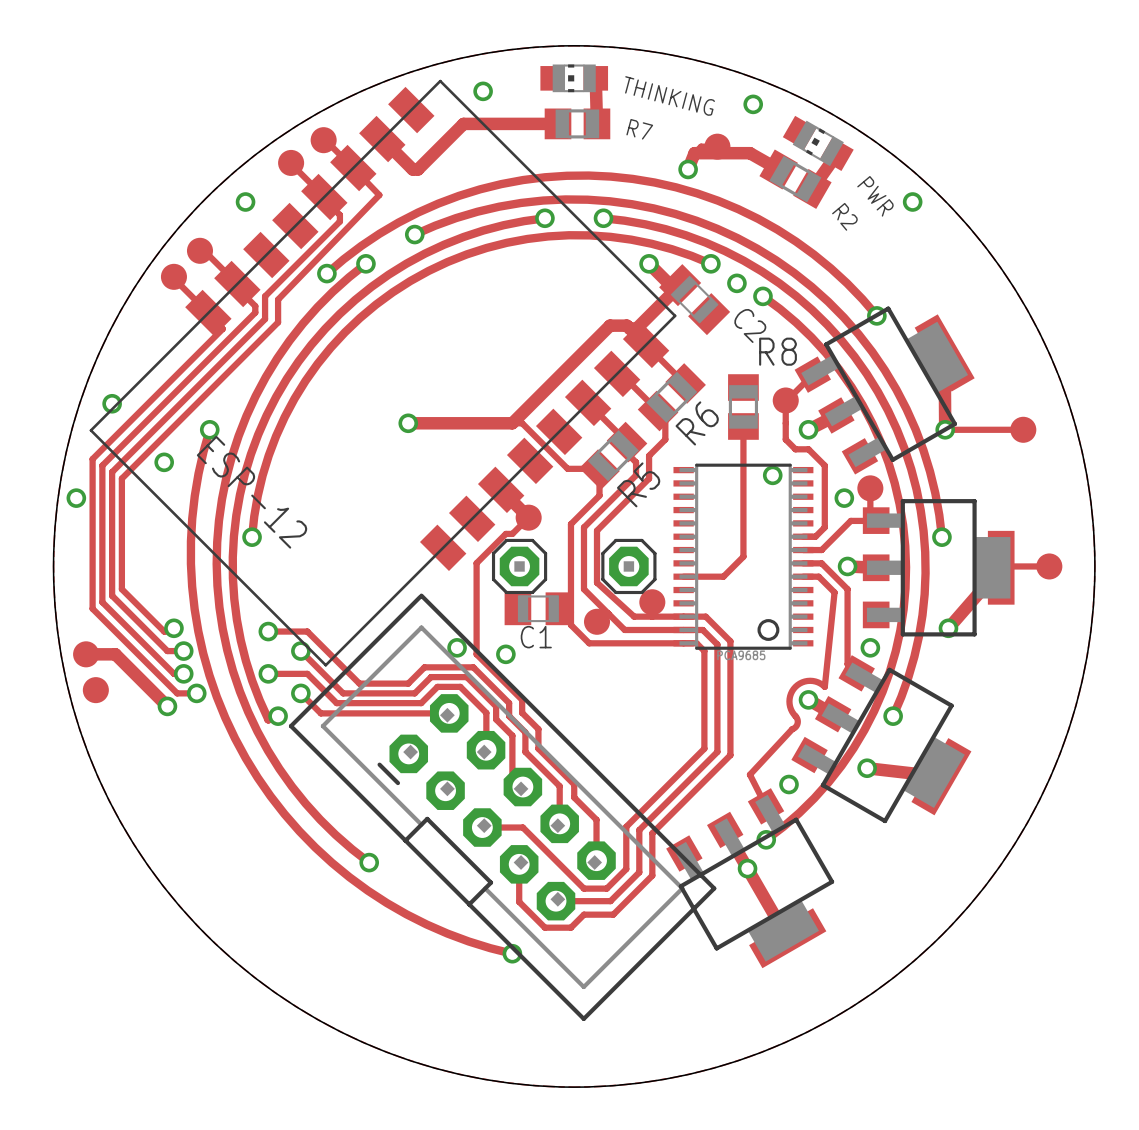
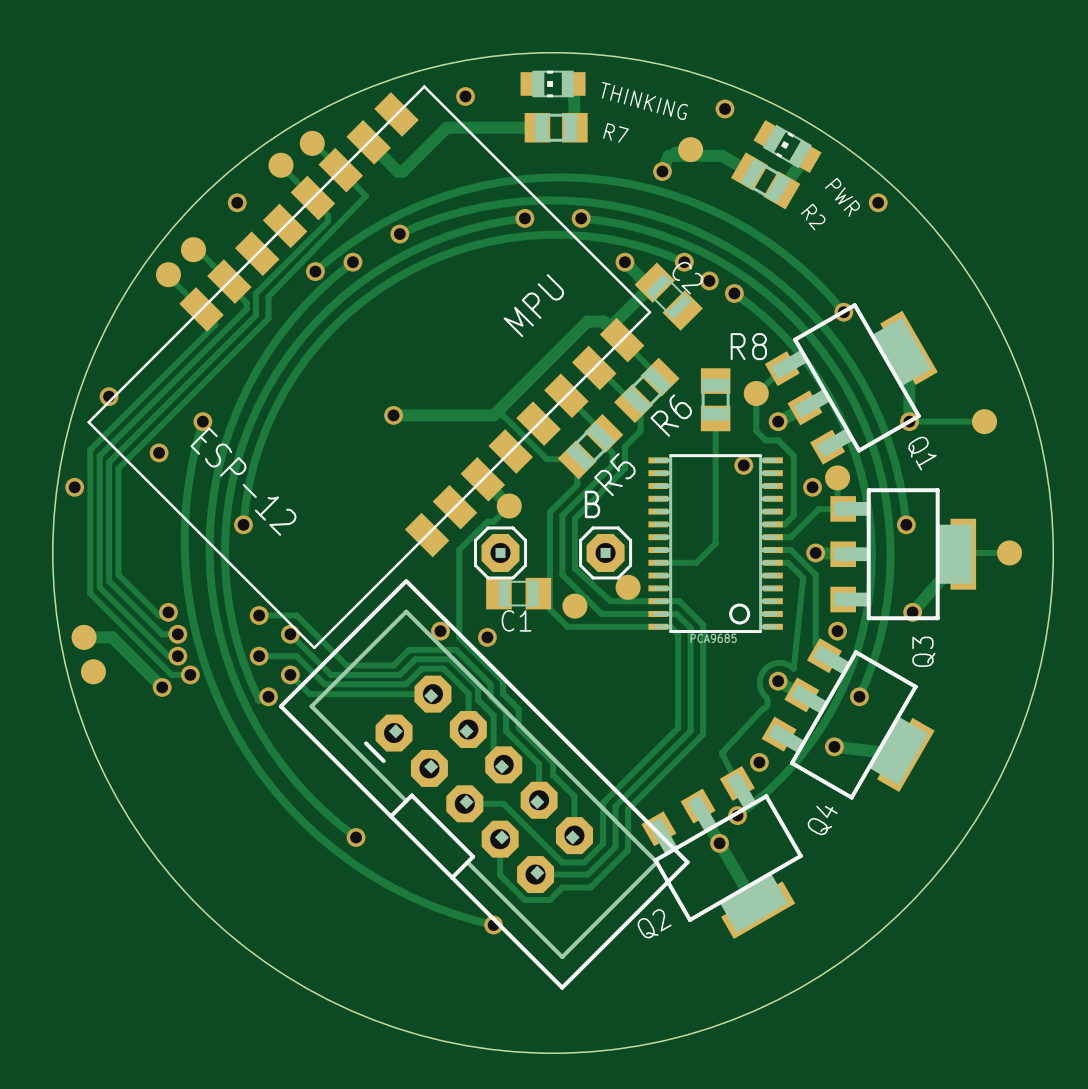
MPU name: none -> MPU (533, 305)
C2 name position: C2 (750, 325) -> C2 (687, 278)
Q1 name: none -> Q1 (922, 453)
B name: none -> B (592, 504)
Q3 name: none -> Q3 (923, 651)
Q4 name: none -> Q4 (822, 820)
Q2 name: none -> Q2 (654, 923)

